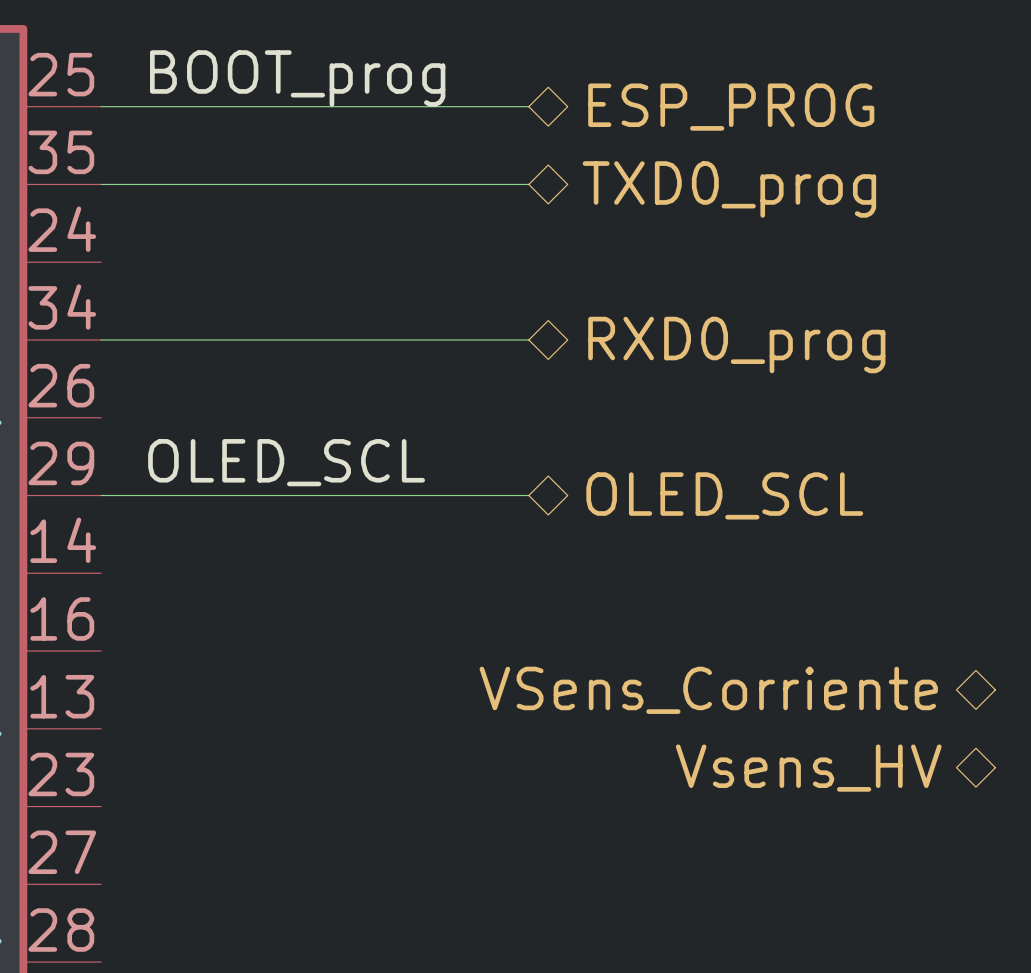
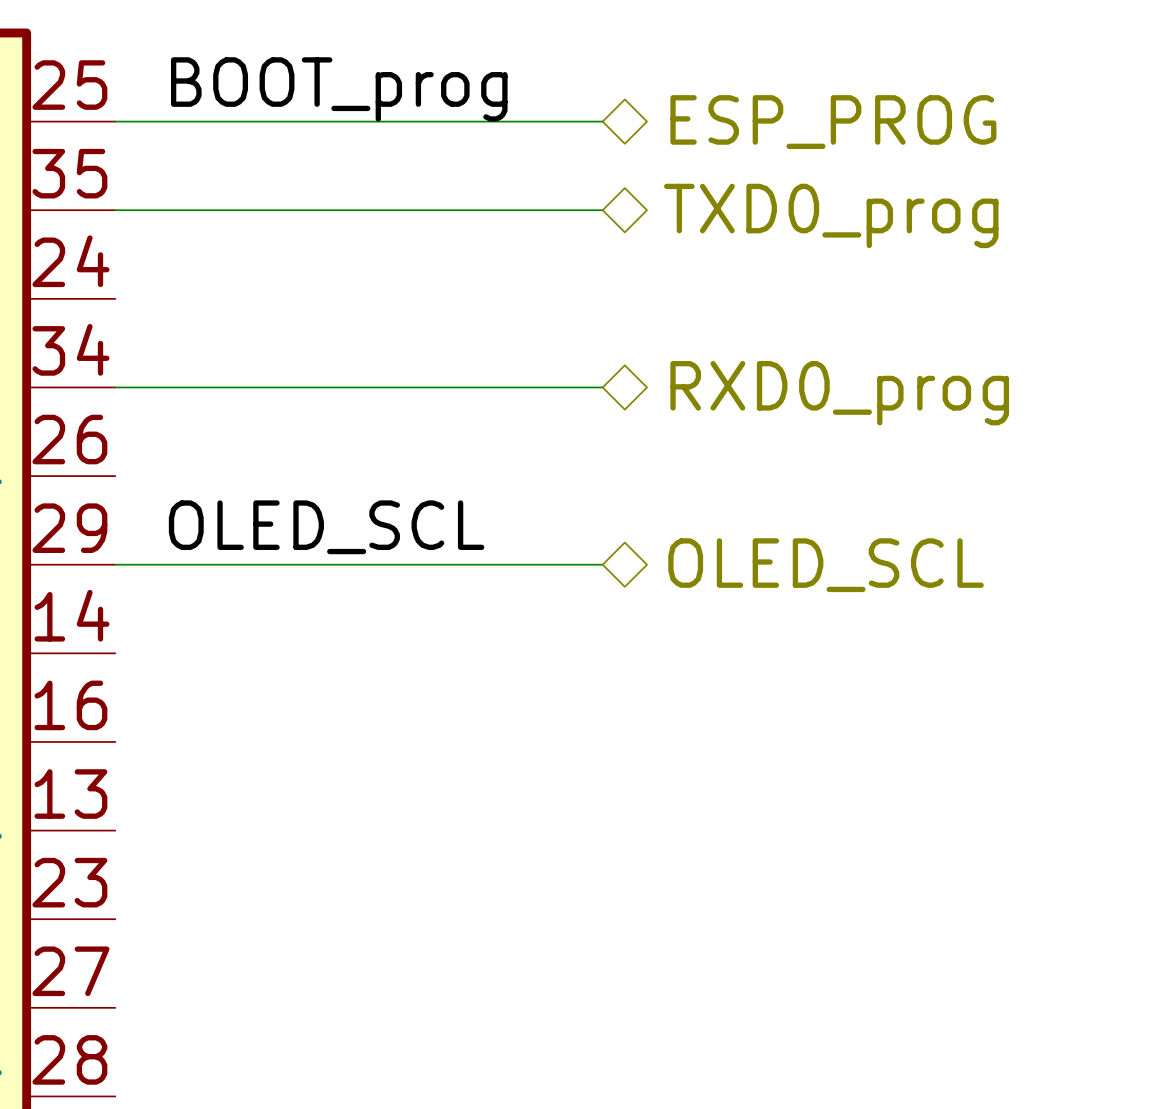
hierarchical label: VSens_Corriente (708, 690) -> none
hierarchical label: Vsens_HV (808, 768) -> none

